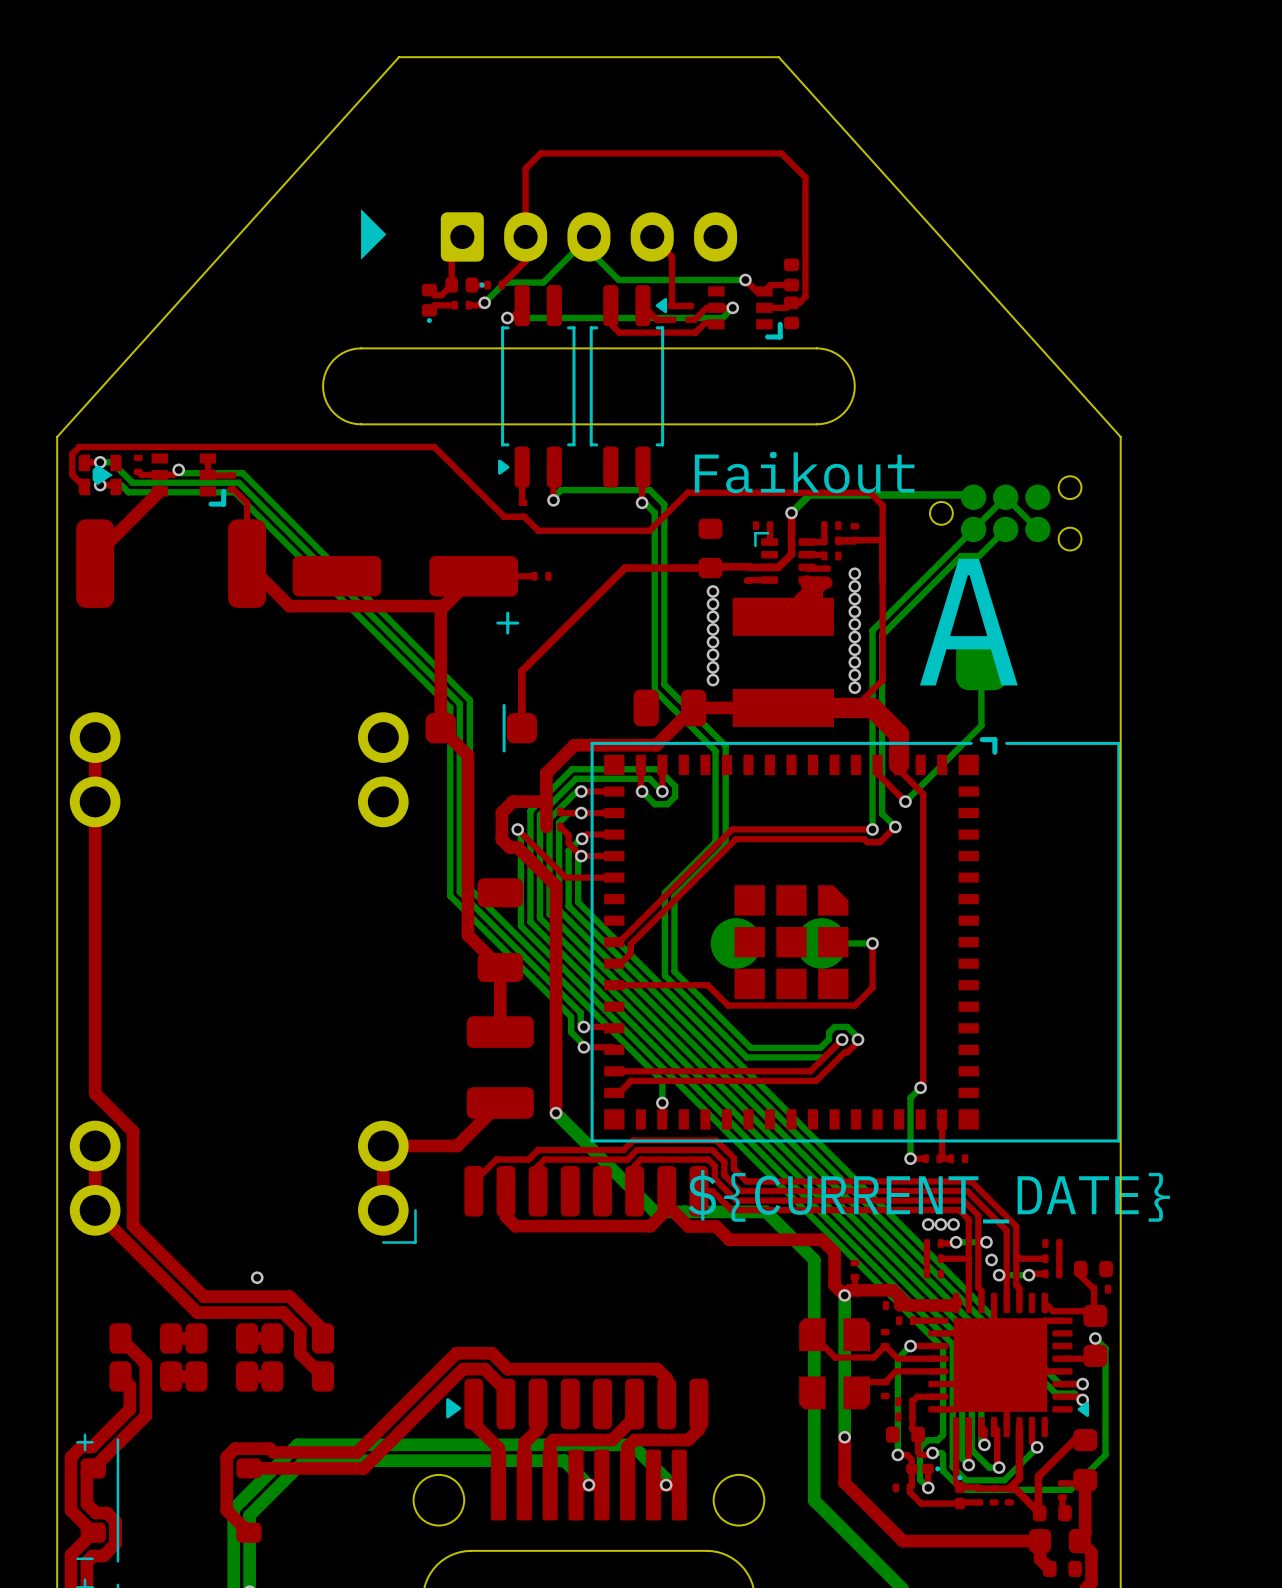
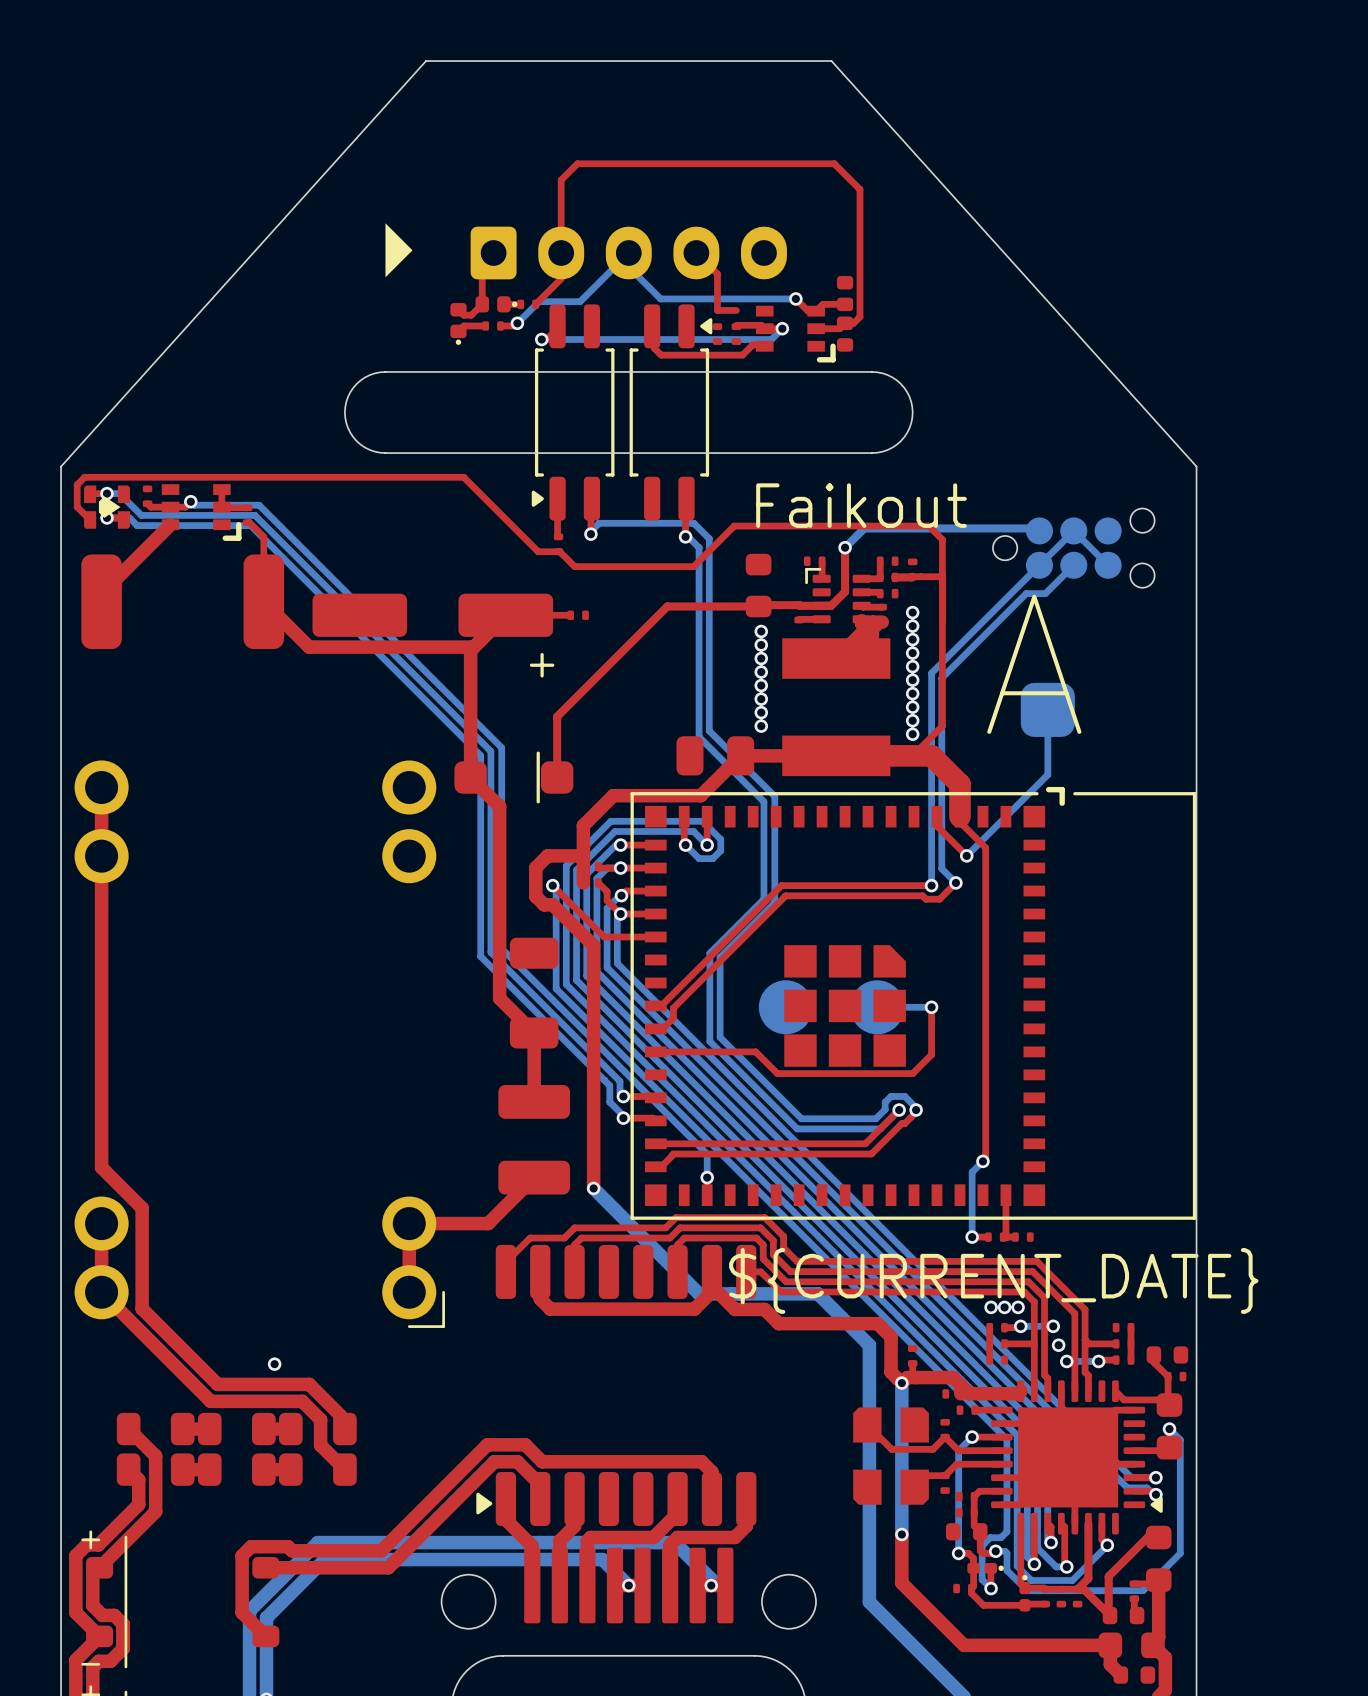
top track: (671, 290) (671, 305) (689, 305) -> (717, 310) (736, 310)
top track: (643, 305) (657, 319) (671, 319) -> none
top track: (716, 307) (706, 307) (694, 319) (689, 319) -> (764, 328) (761, 325) (736, 325)

